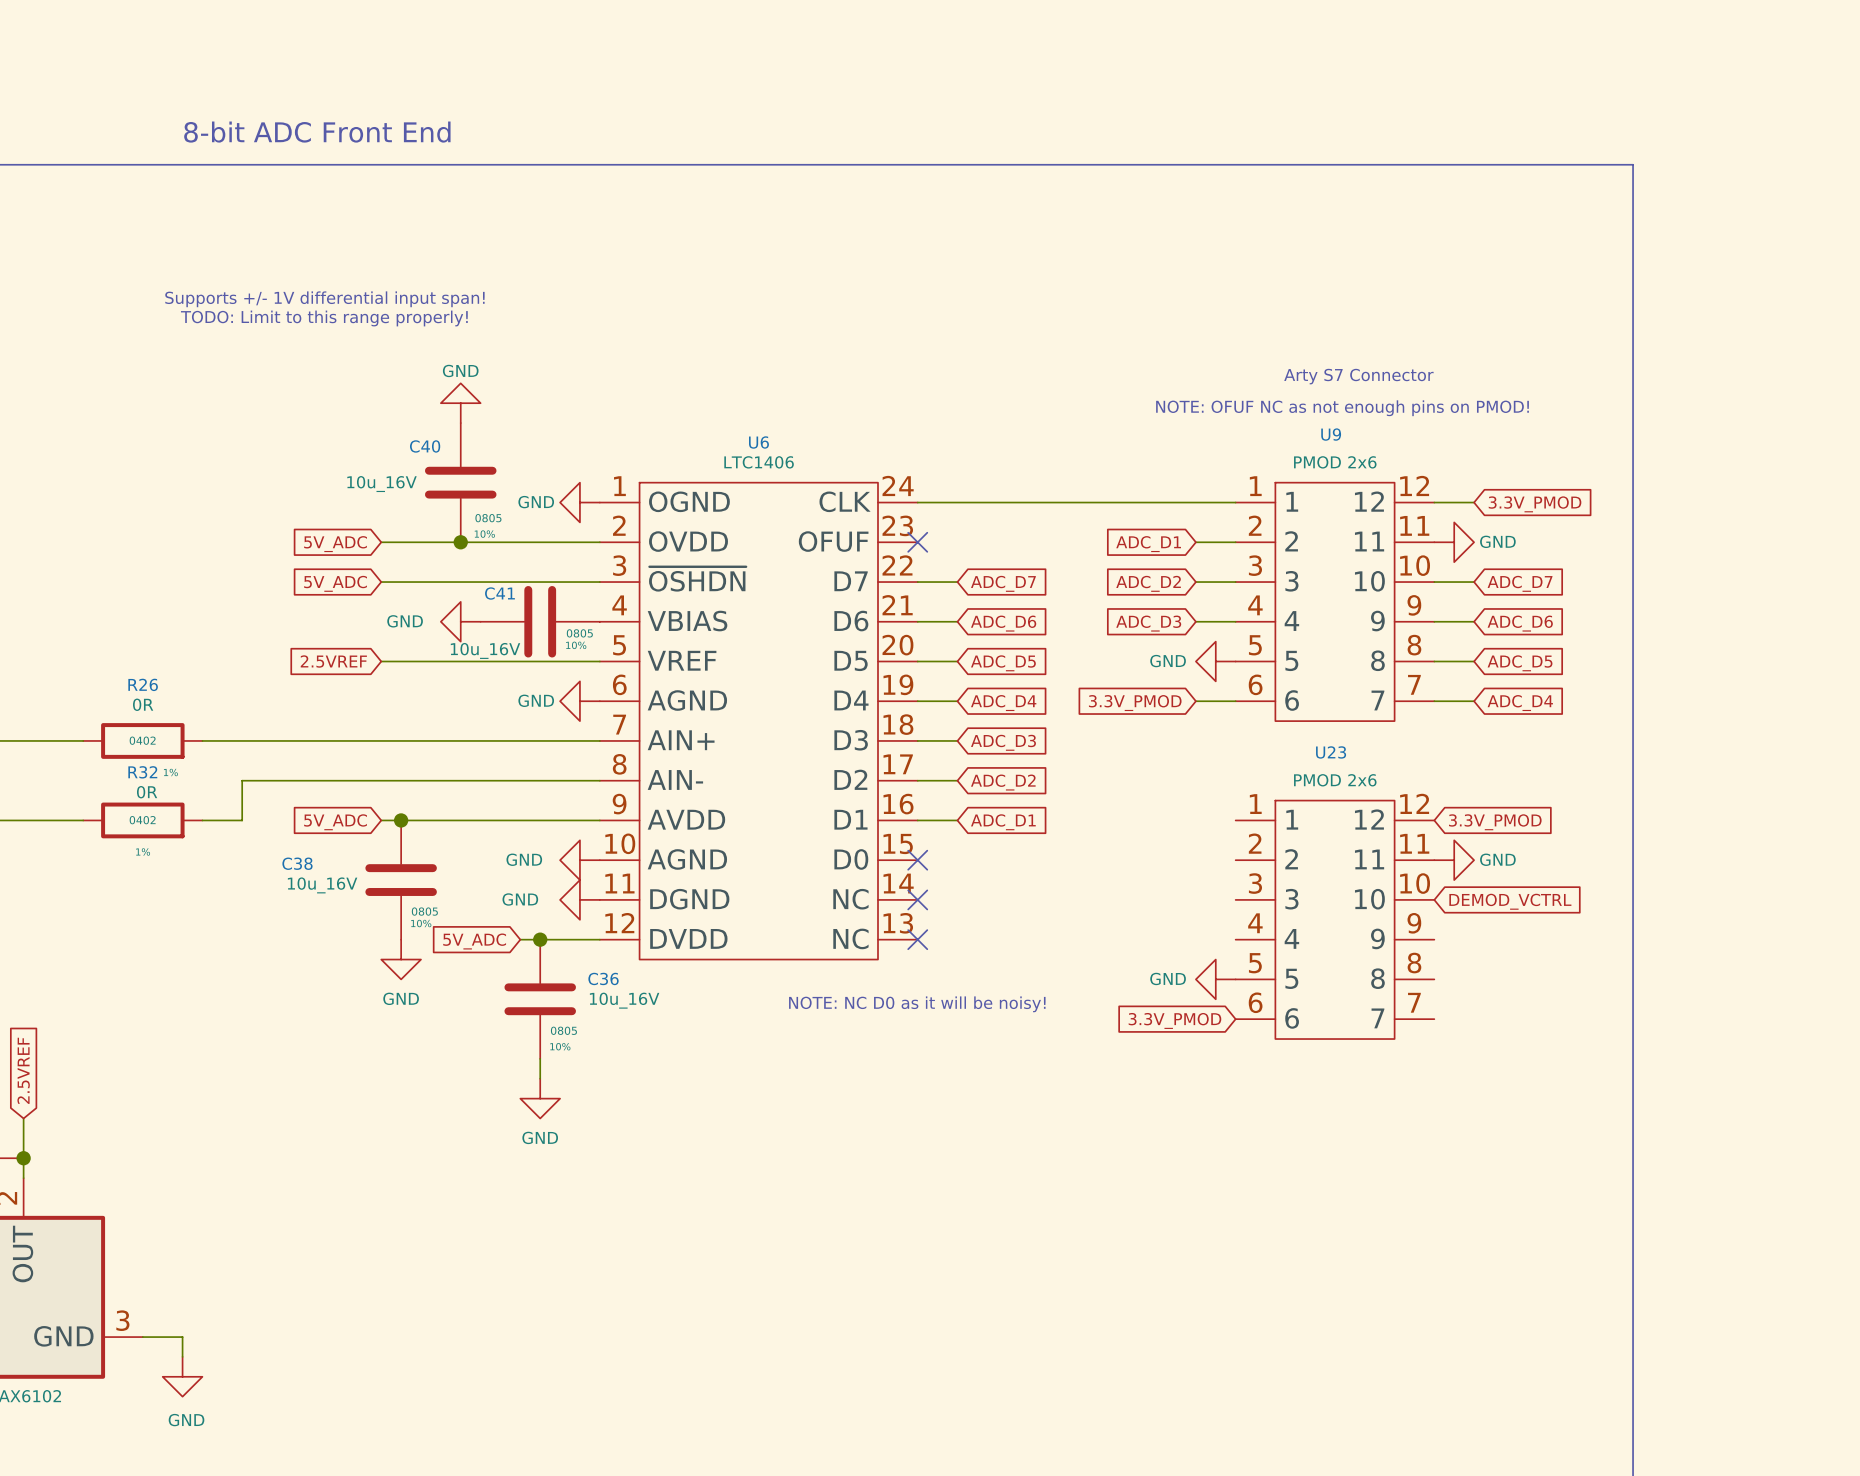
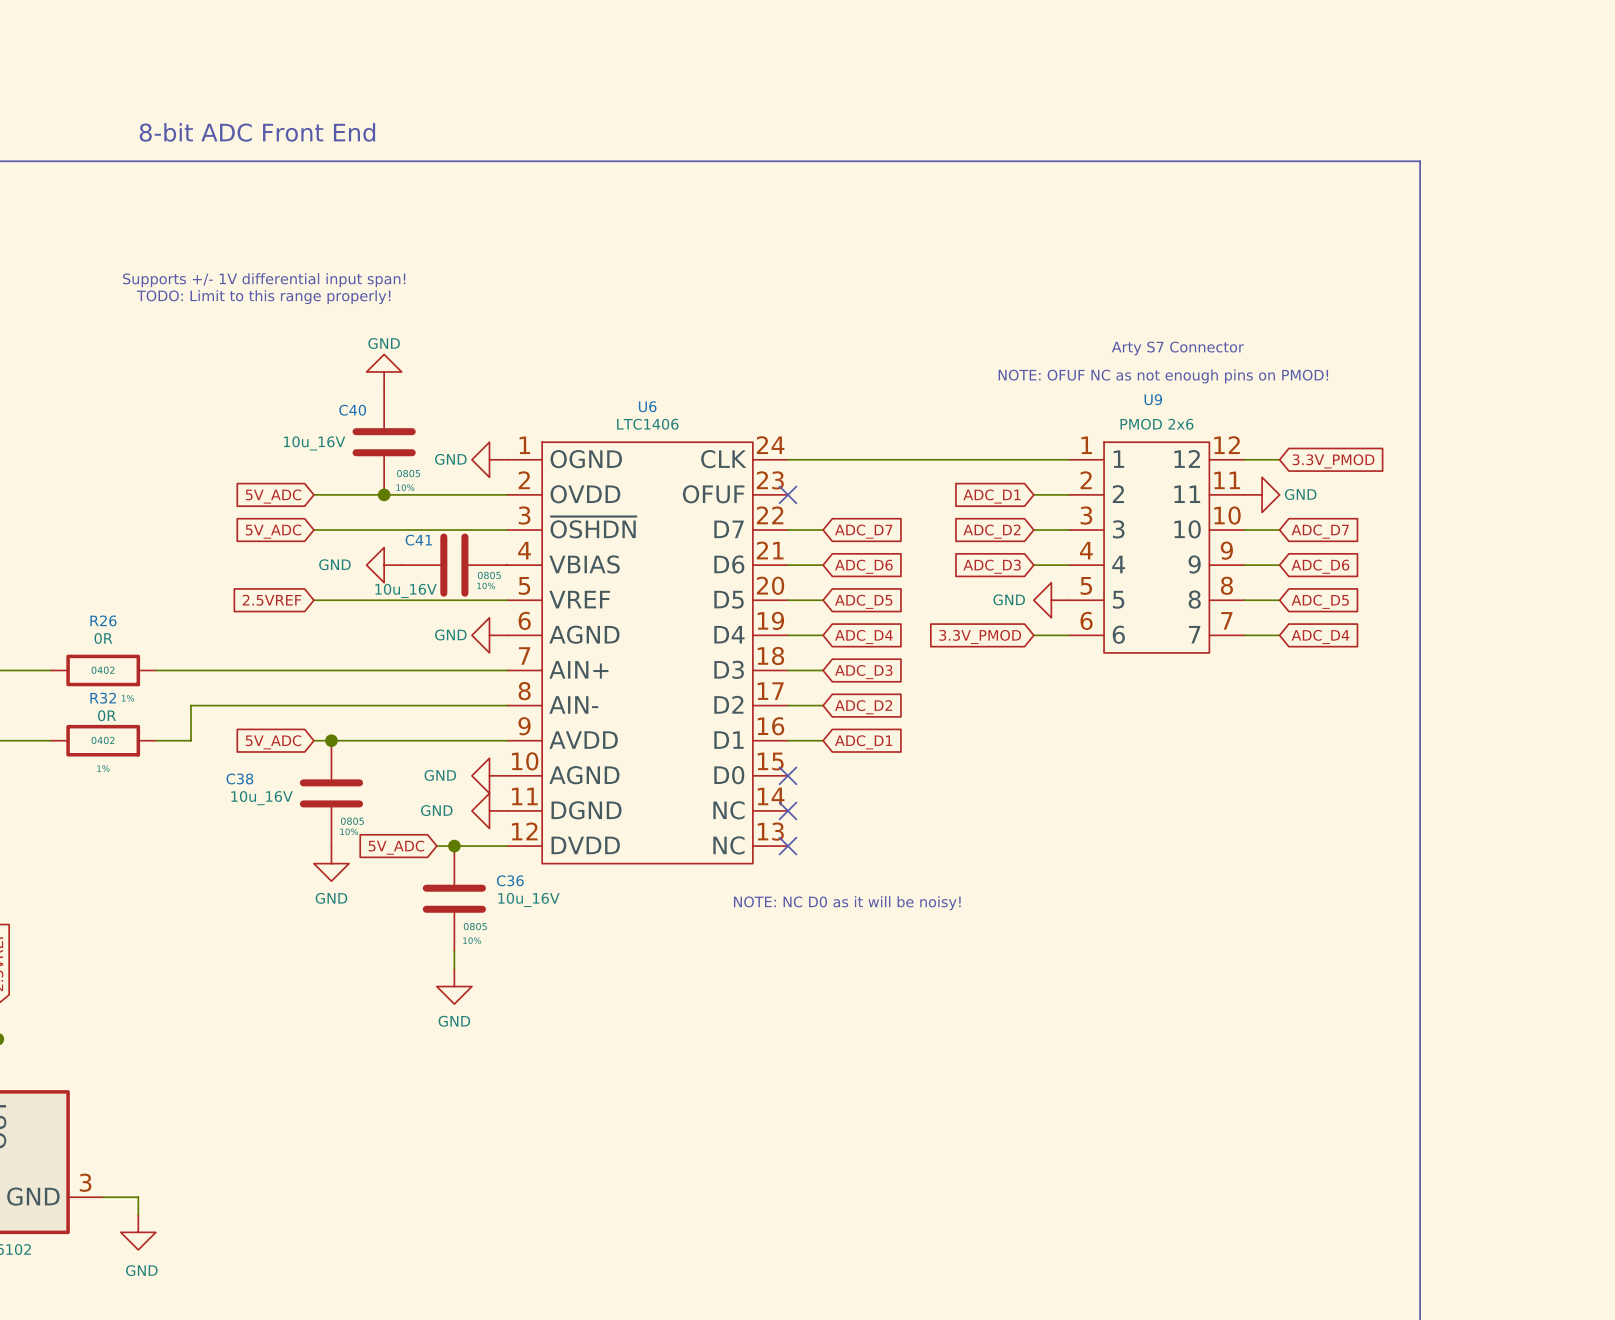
global label: 3.3V_PMOD (1495, 822) -> none
power symbol: GND (1454, 860) -> none
global label: DEMOD_VCTRL (1510, 901) -> none
U23: PMOD 2x6 (1334, 919) -> none
power symbol: GND (1215, 979) -> none
text position: NOTE: NC D0 as it will be noisy! (917, 1004) -> NOTE: NC D0 as it will be noisy! (847, 903)
global label: 3.3V_PMOD (1174, 1020) -> none

